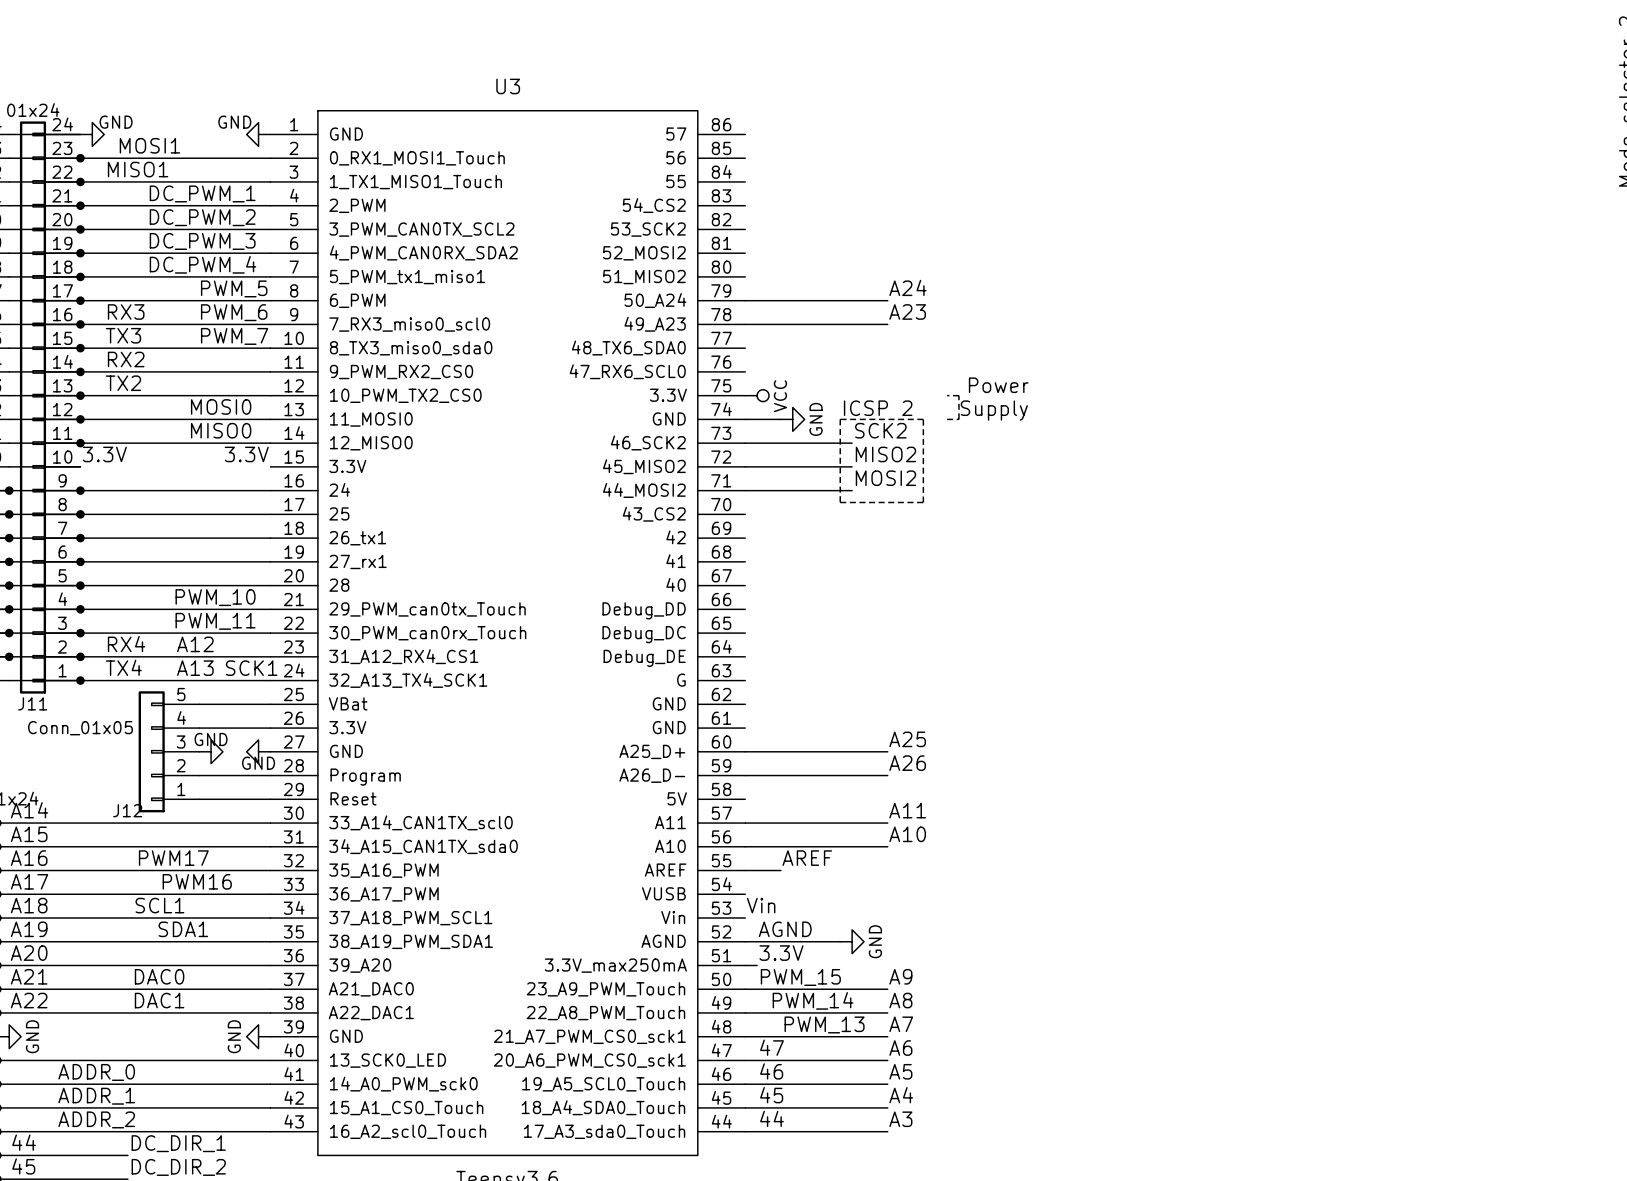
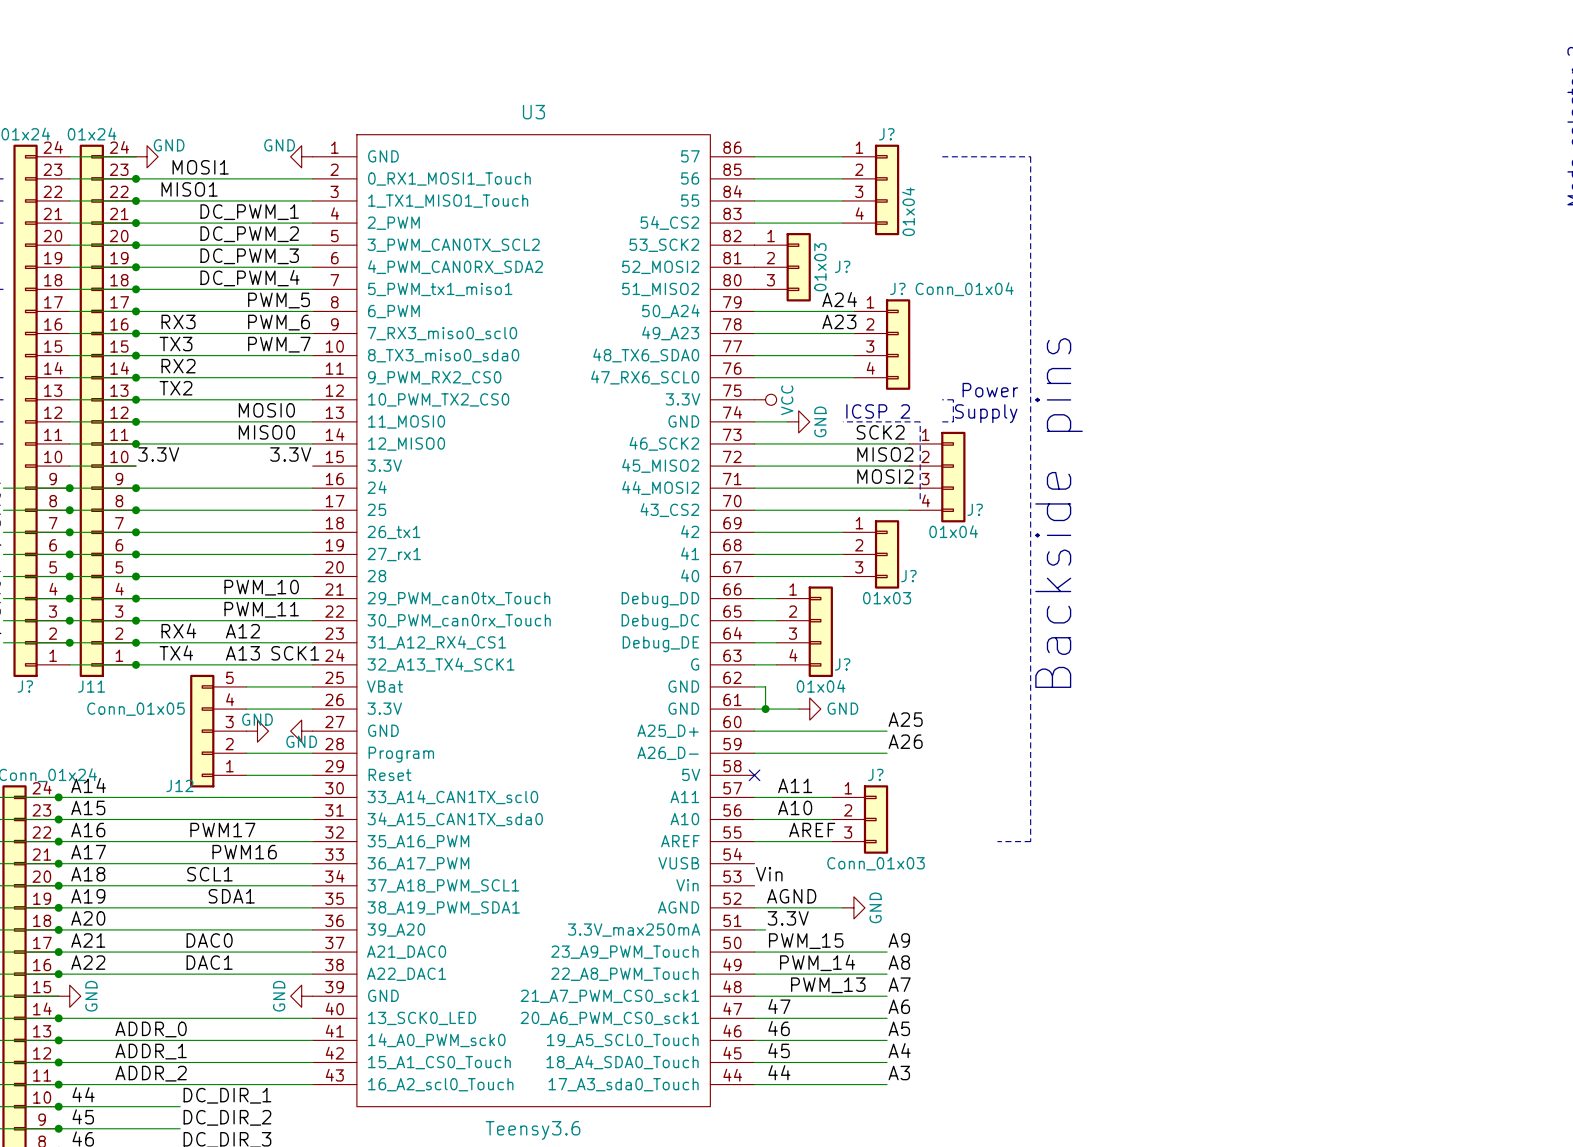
wire: none -> (754, 156) (842, 156)
line: none -> (942, 156) (1030, 156) (1030, 841) (997, 841)
wire: none -> (754, 178) (842, 178)
J?: none -> 01x04 (871, 189)
wire: none -> (754, 200) (842, 200)
wire: none -> (754, 223) (842, 223)
J?: none -> 01x03 (782, 267)
label position: A24 (908, 287) -> A24 (839, 299)
label position: A23 (907, 312) -> A23 (839, 321)
J?: none -> Conn_01x04 (882, 344)
wire: none -> (754, 355) (853, 355)
wire: none -> (754, 377) (853, 377)
line: (840, 419) (840, 502) (923, 502) -> none
wire: none -> (853, 443) (909, 443)
wire: none -> (853, 466) (909, 466)
J?: none -> 01x04 (937, 477)
wire: none -> (853, 488) (909, 488)
wire: none -> (754, 510) (909, 510)
text: none -> Backside pins (1059, 513)
wire: none -> (754, 532) (842, 532)
wire: none -> (754, 554) (842, 554)
J?: none -> 01x03 (871, 554)
wire: none -> (754, 576) (842, 576)
wire: none -> (754, 598) (776, 598)
wire: none -> (754, 620) (776, 620)
J?: none -> 01x04 (804, 631)
wire: none -> (754, 642) (776, 642)
wire: none -> (754, 664) (776, 664)
wire: none -> (754, 686) (765, 686) (765, 709)
wire: none -> (754, 709) (798, 709)
junction: none -> (765, 709)
power symbol: none -> GND (809, 709)
no-connect mark: none -> (754, 775)
label position: A11 (907, 810) -> A11 (795, 785)
label position: A10 (907, 834) -> A10 (795, 807)
J?: none -> Conn_01x03 (860, 819)
wire: none -> (787, 841) (831, 841)

